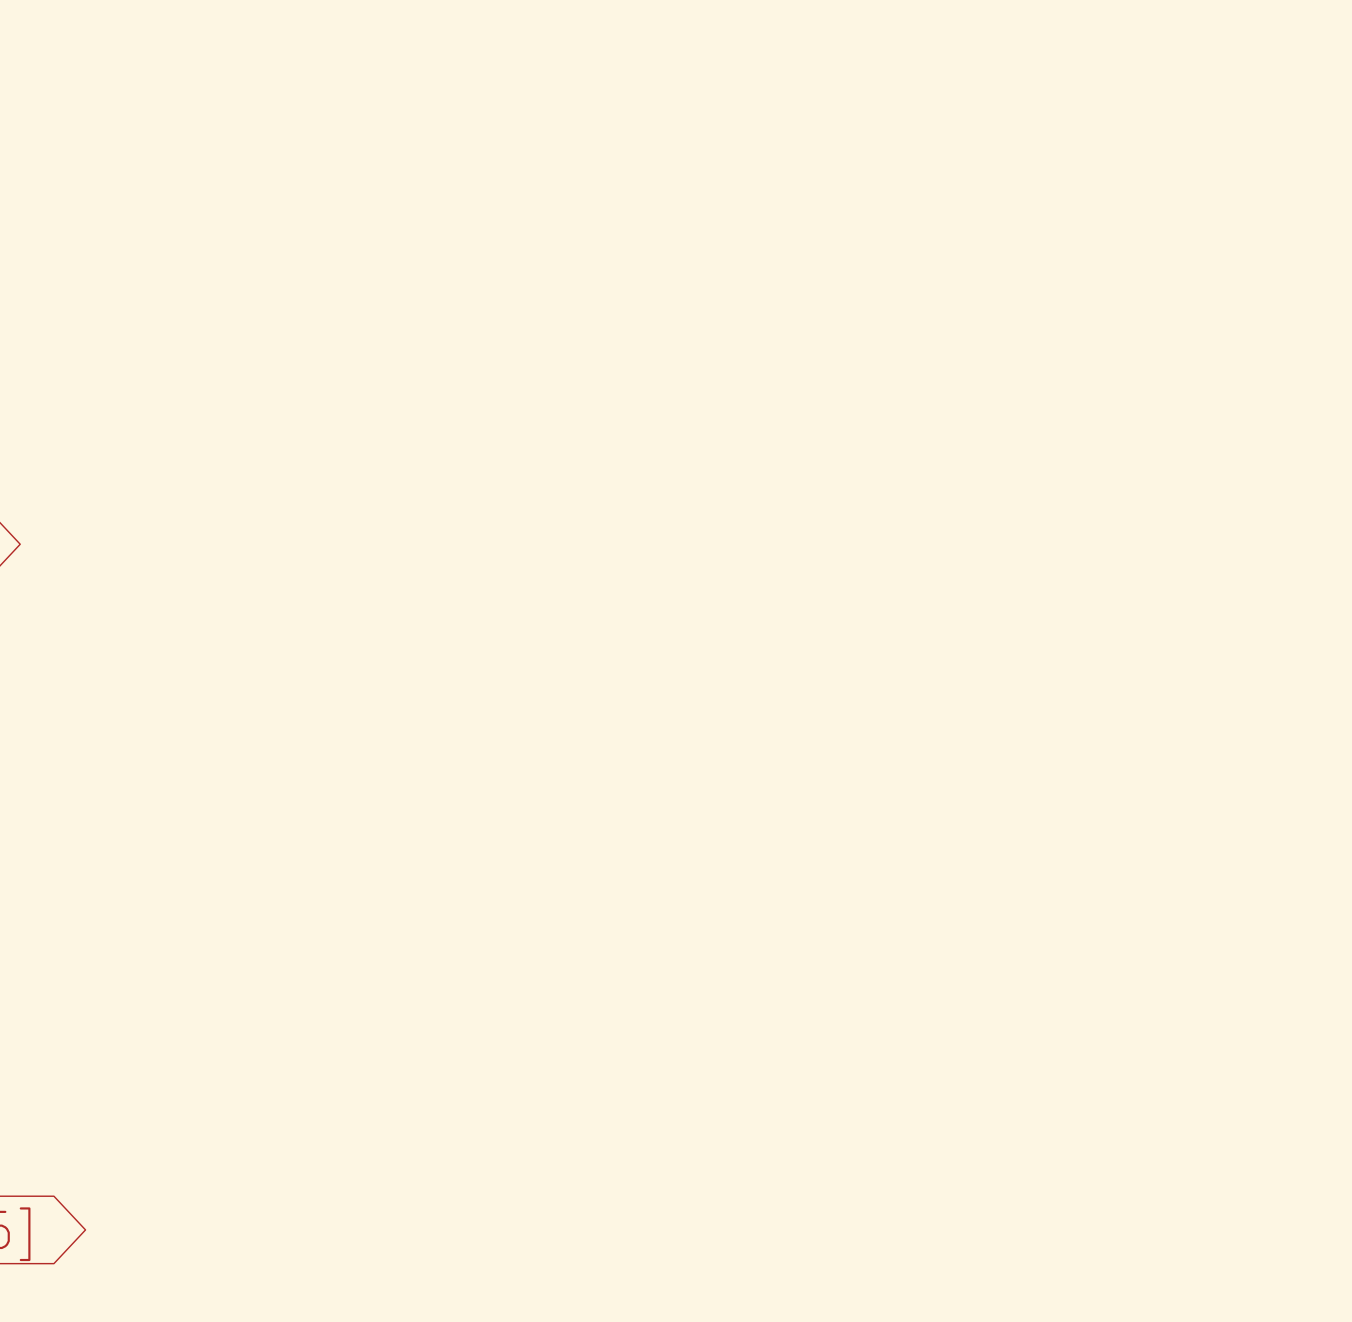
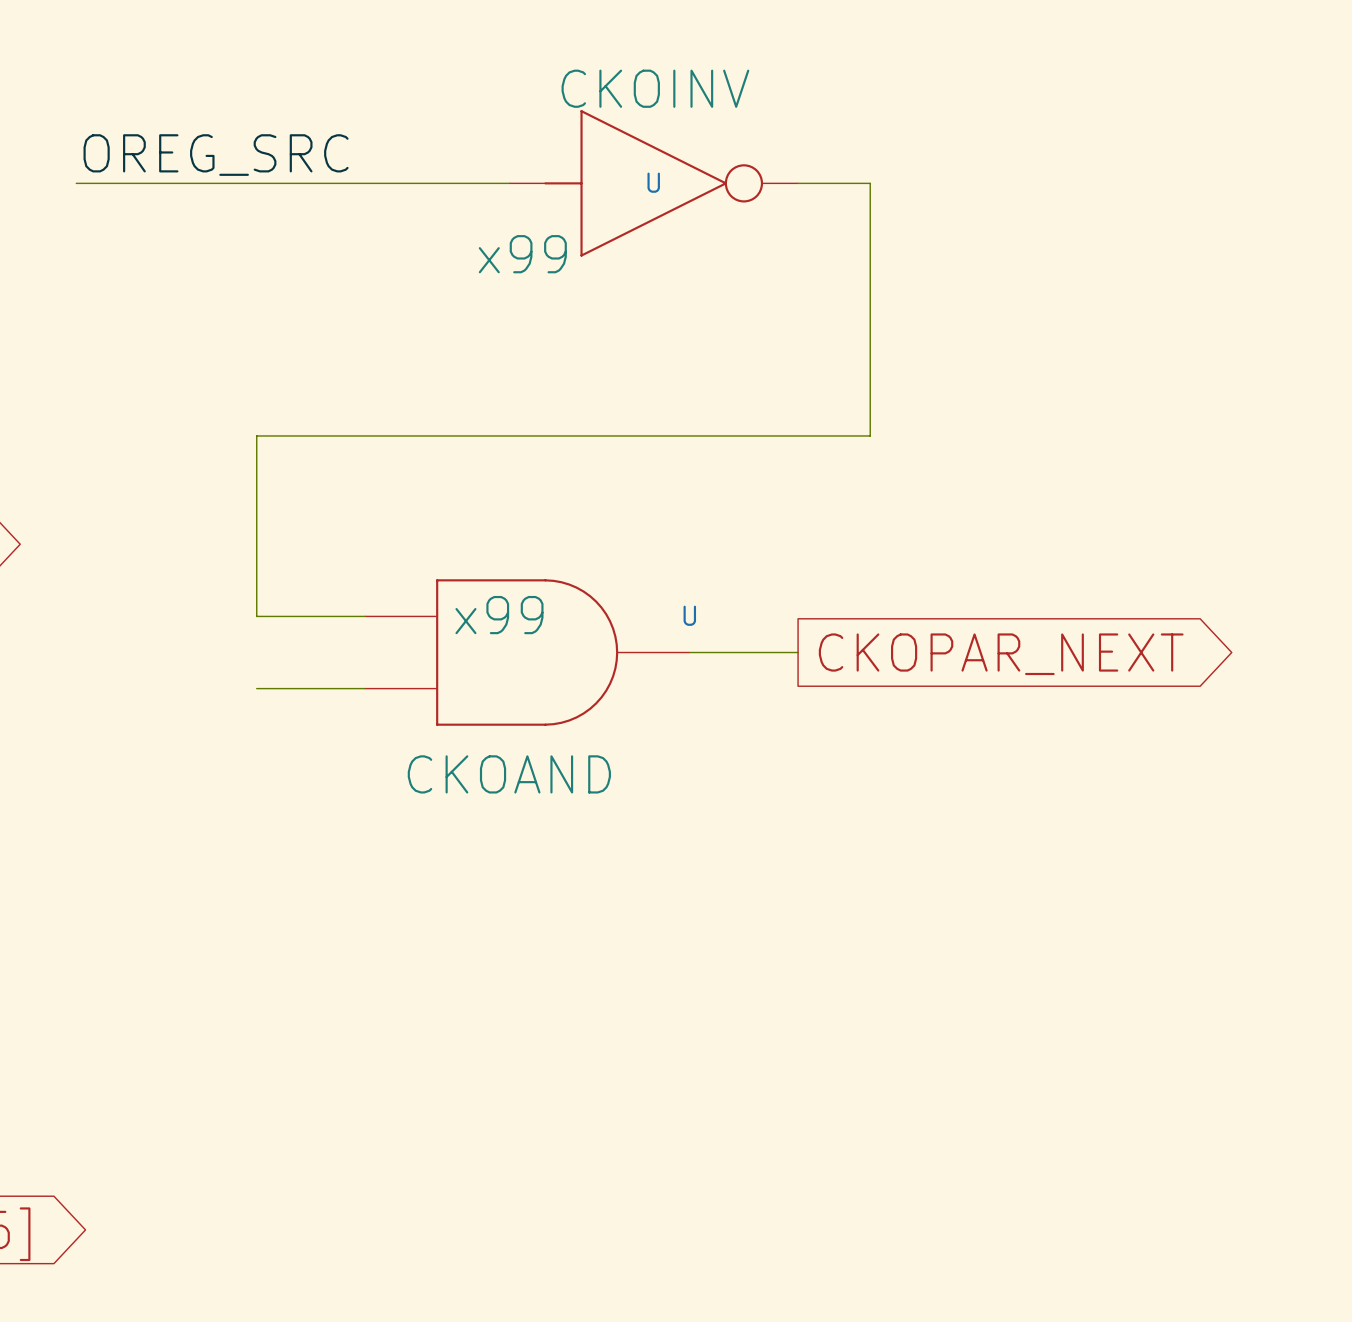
label: none -> OREG_SRC (216, 155)
wire: none -> (76, 183) (509, 183)
U: none -> (653, 183)
wire: none -> (798, 183) (870, 183) (870, 435) (256, 435) (256, 616) (365, 616)
U: none -> (527, 652)
wire: none -> (689, 652) (798, 652)
global label: none -> CKOPAR_NEXT (1001, 654)
wire: none -> (256, 688) (365, 688)

